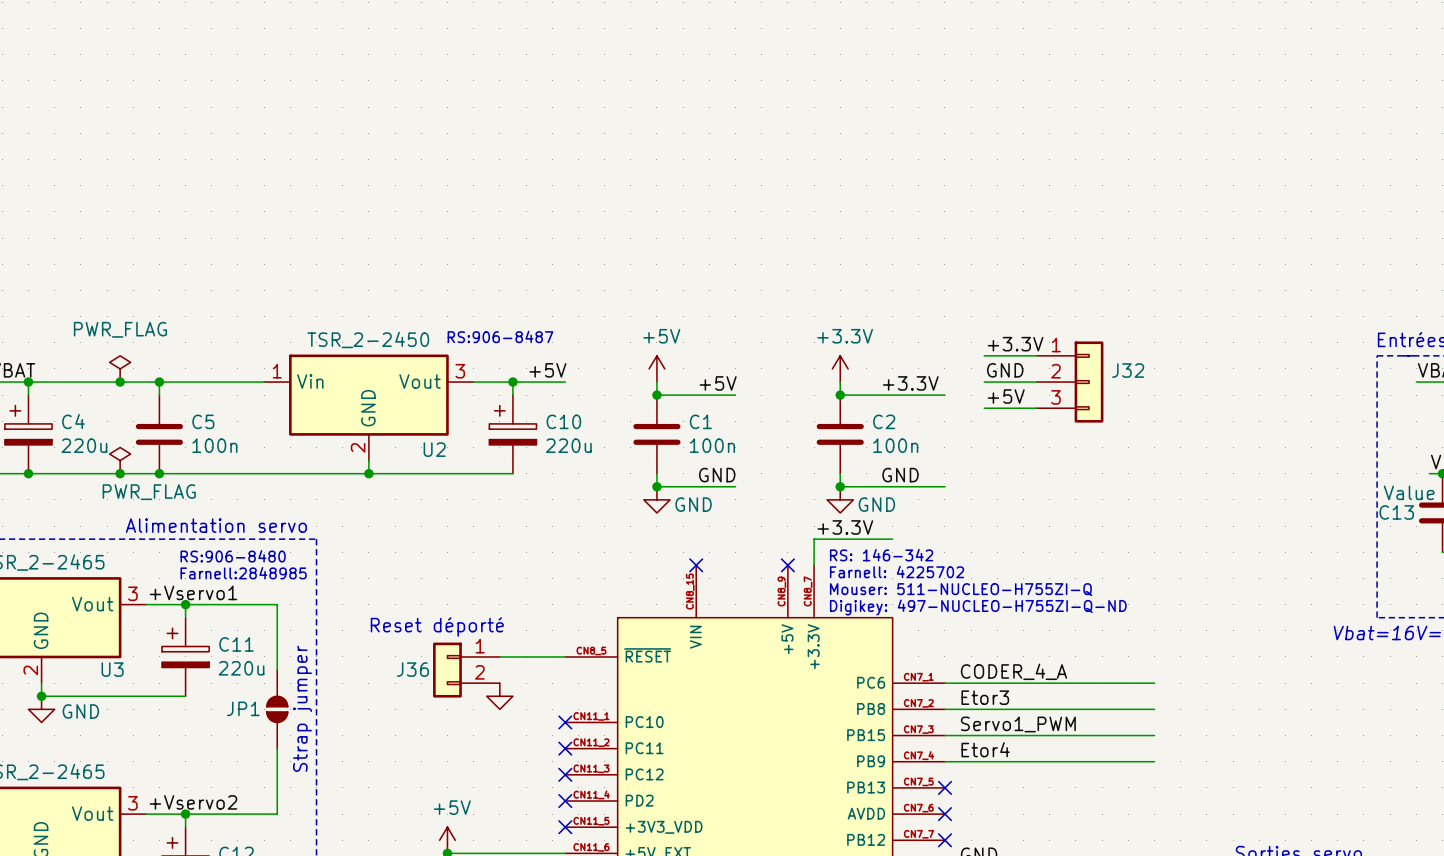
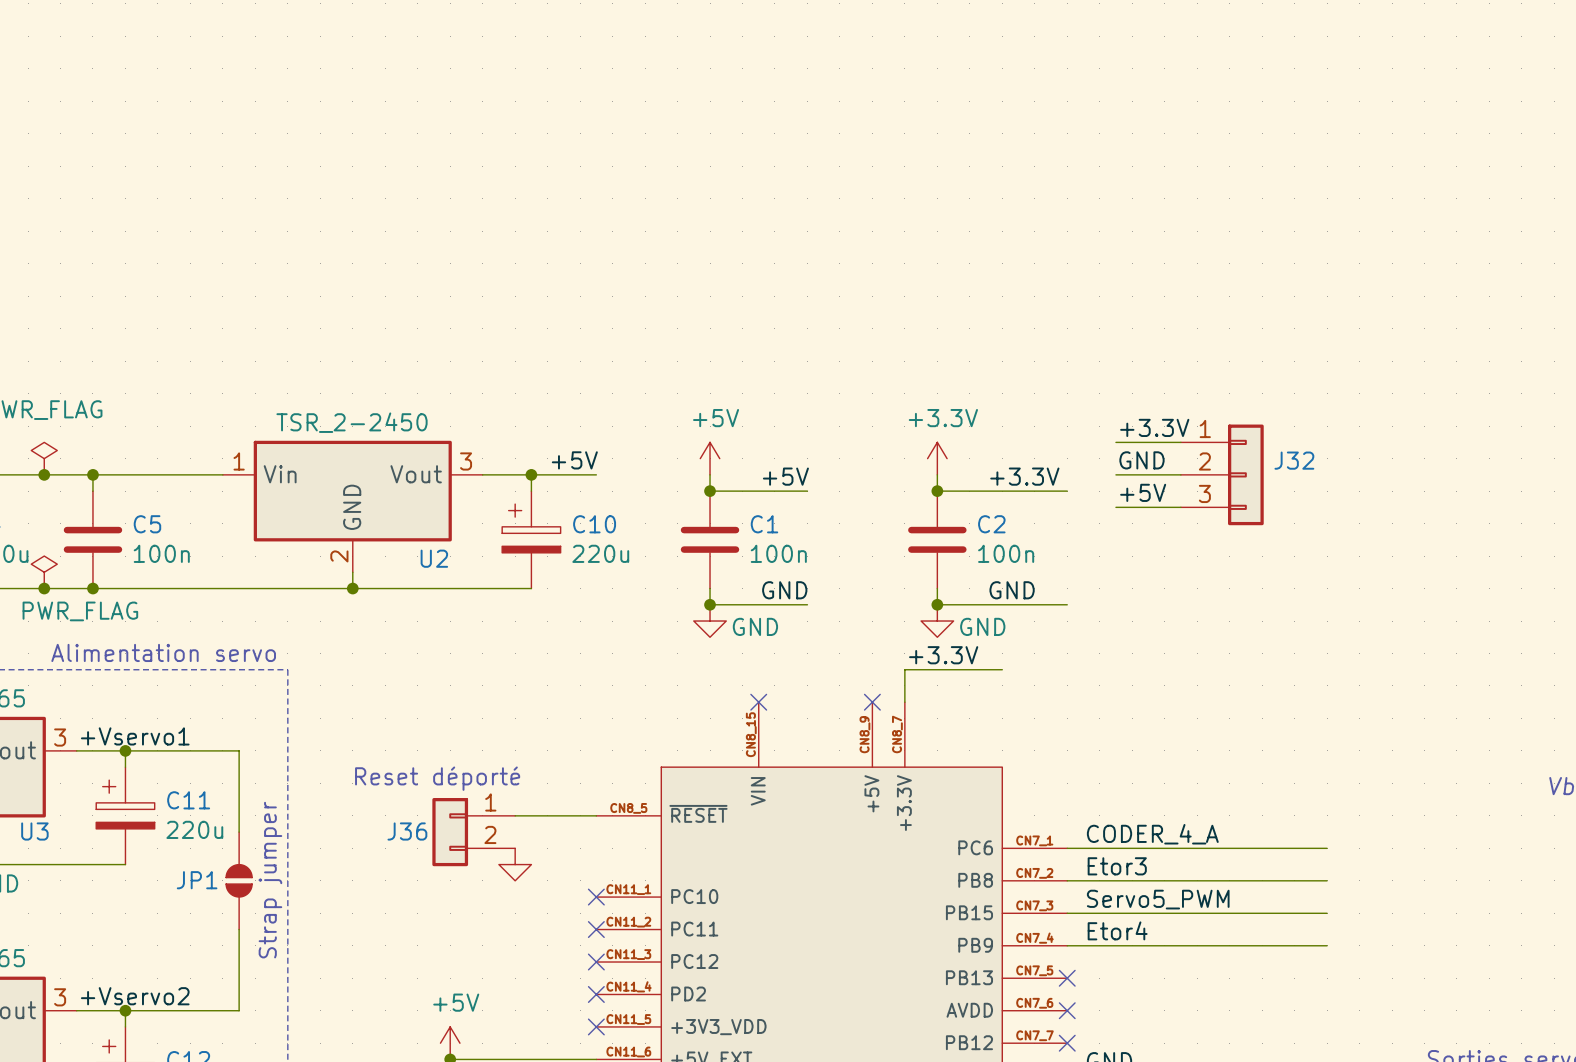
text: RS:906-8487 (500, 336) -> none
text: RS: 146-342 (881, 555) -> none
text: RS:906-8480 (233, 556) -> none
text: Farnell: 4225702 (897, 572) -> none
text: Farnell:2848985 (243, 573) -> none
text: Mouser: 511-NUCLEO-H755ZI-Q (961, 589) -> none
text: Digikey: 497-NUCLEO-H755ZI-Q-ND (978, 607) -> none
label: Servo1_PWM (1018, 724) -> Servo5_PWM (1158, 899)

